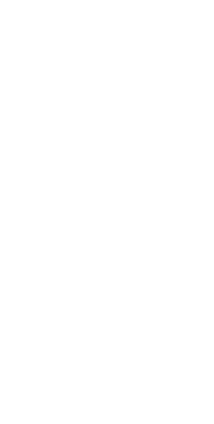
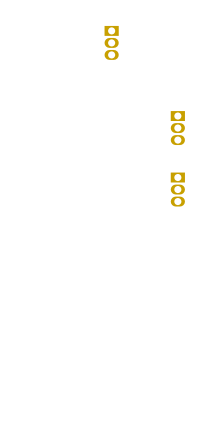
part: none -> (111, 42)
part: none -> (177, 128)
part: none -> (177, 189)

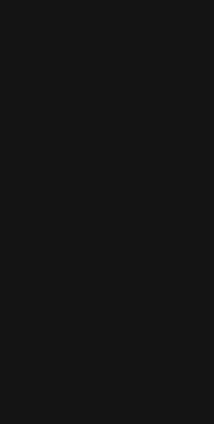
part: (111, 42) -> none
part: (177, 128) -> none
part: (177, 189) -> none

